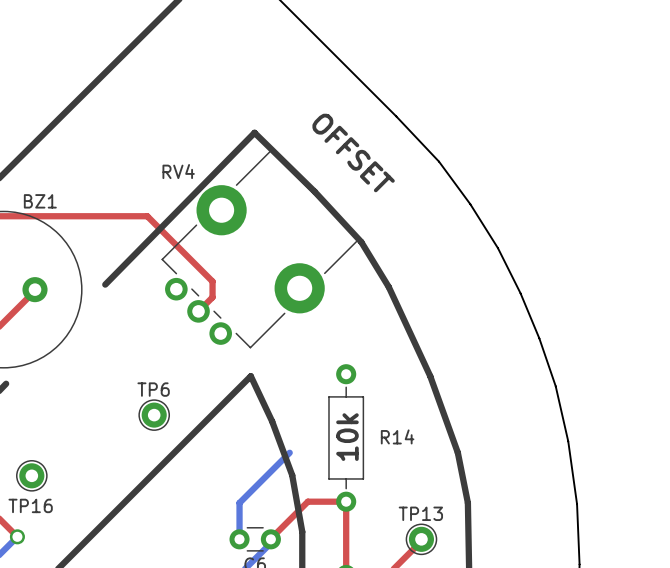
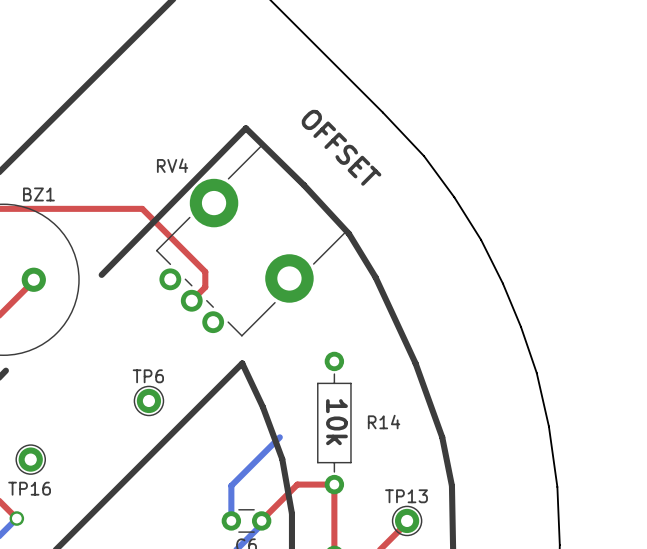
text rotation: 0° (347, 437) -> 180° (336, 422)

